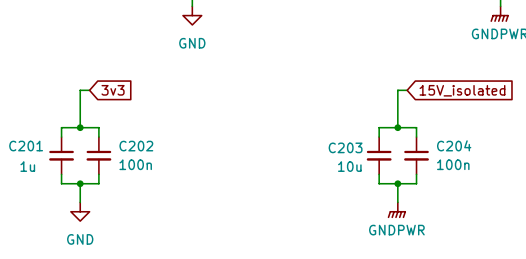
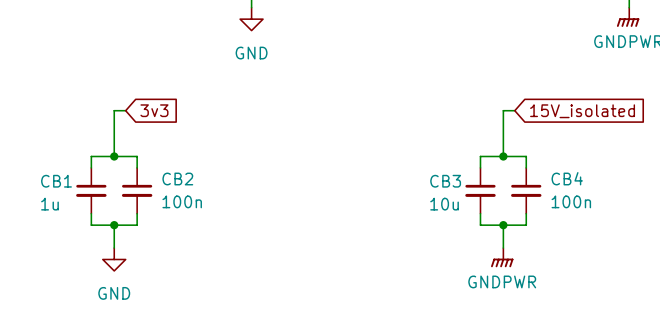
C204 name: C204 (454, 145) -> CB4 (567, 178)
C201 name: C201 (26, 146) -> CB1 (56, 181)
C202 name: C202 (136, 146) -> CB2 (177, 179)
C203 name: C203 (345, 147) -> CB3 (445, 181)

